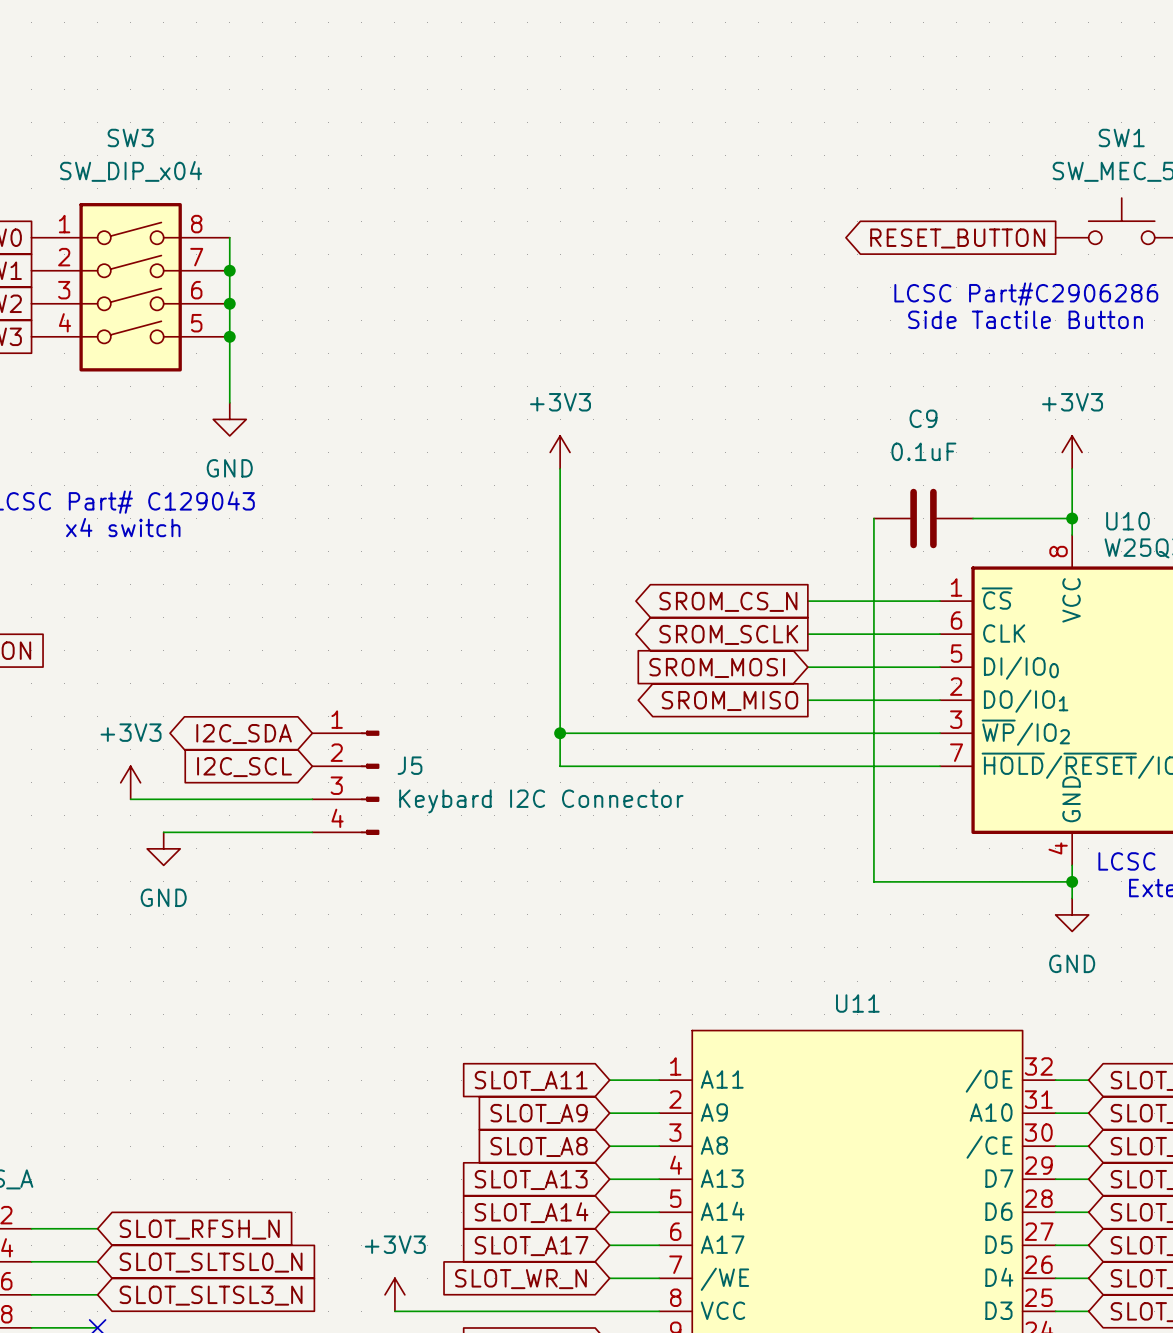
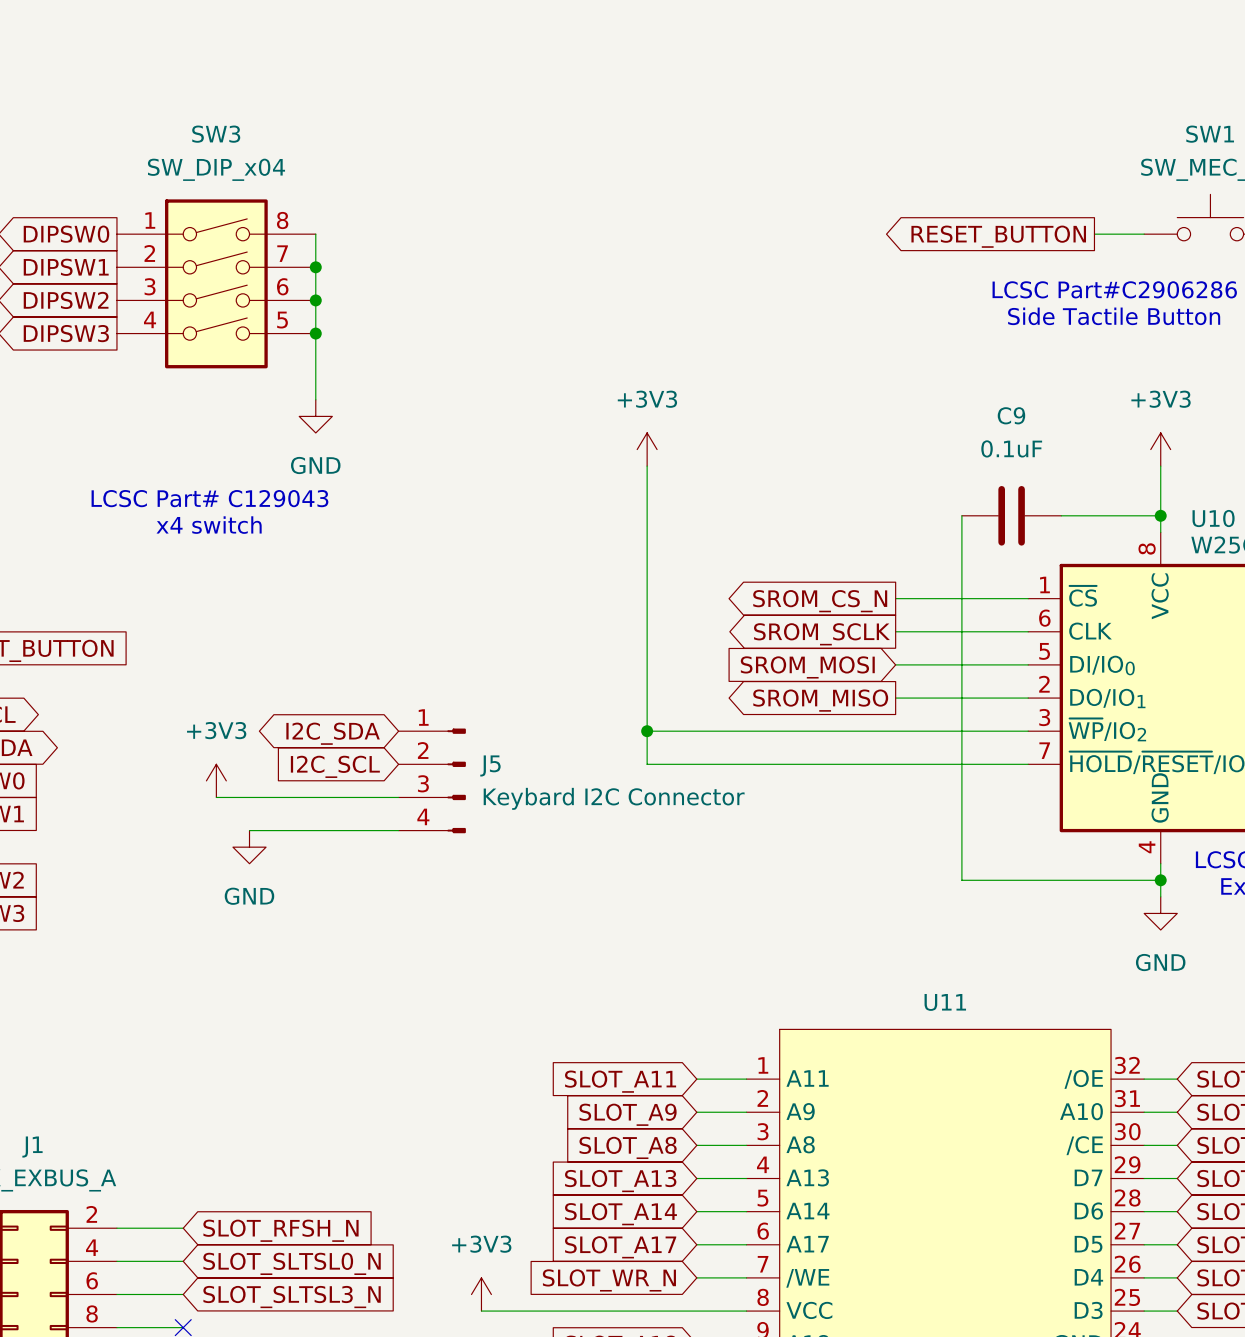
wire: none -> (1094, 234) (1144, 234)
global label position: RESET_BUTTON (957, 238) -> RESET_BUTTON (998, 236)

